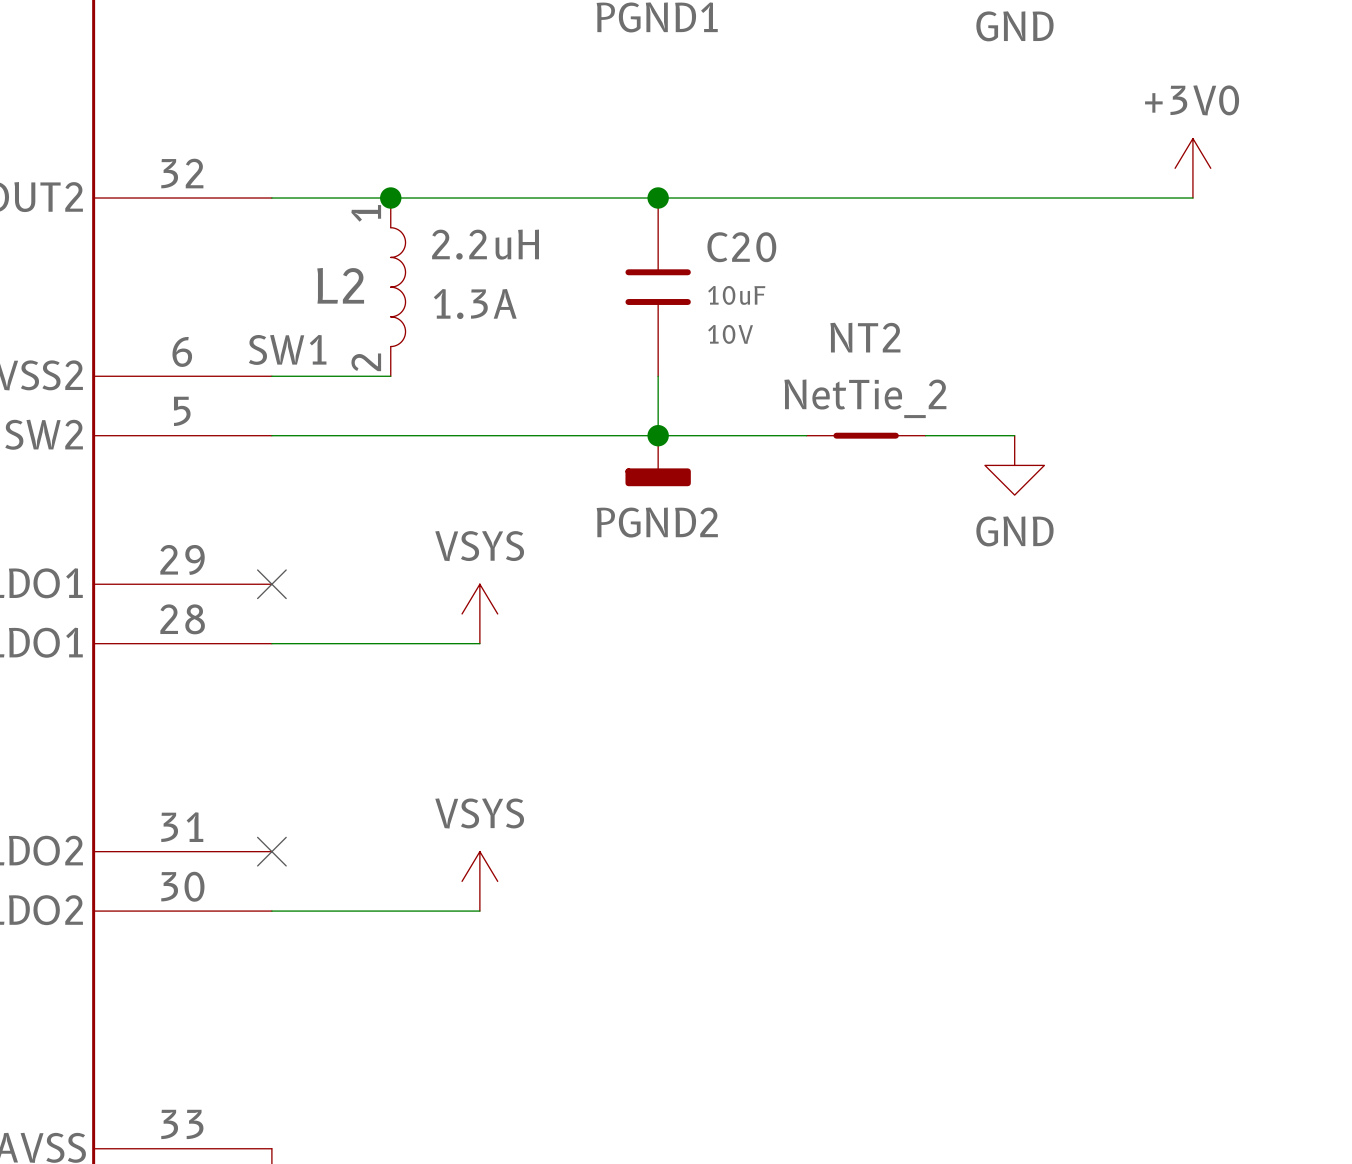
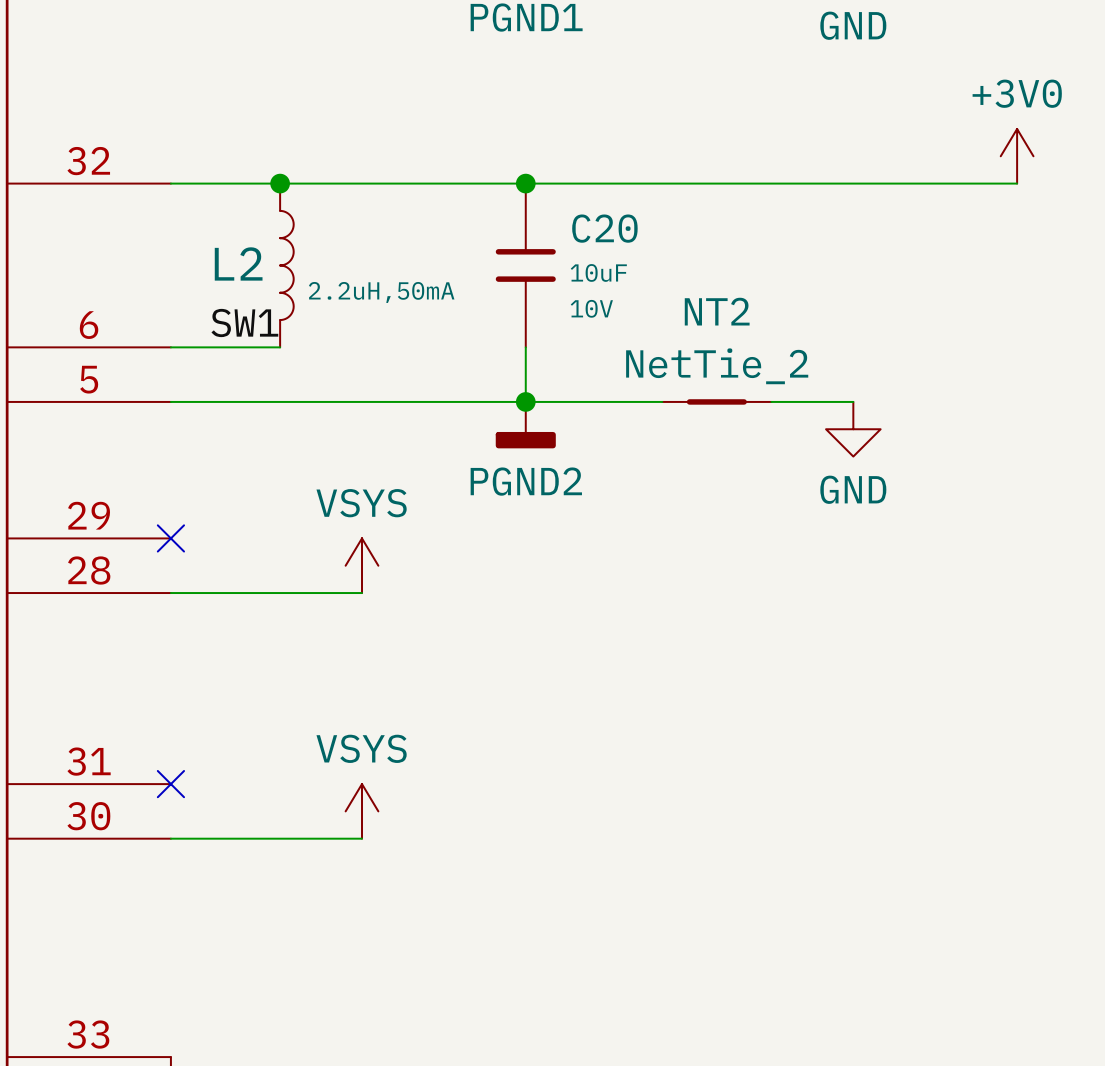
L2 pin number: 1 (366, 213) -> none
L2 text: 2.2uH (485, 244) -> none
L2 text: 1.3A (475, 304) -> none
L2 value: none -> 2.2uH,50mA (381, 292)
label position: SW1 (287, 349) -> SW1 (244, 323)
L2 pin number: 2 (366, 362) -> none

